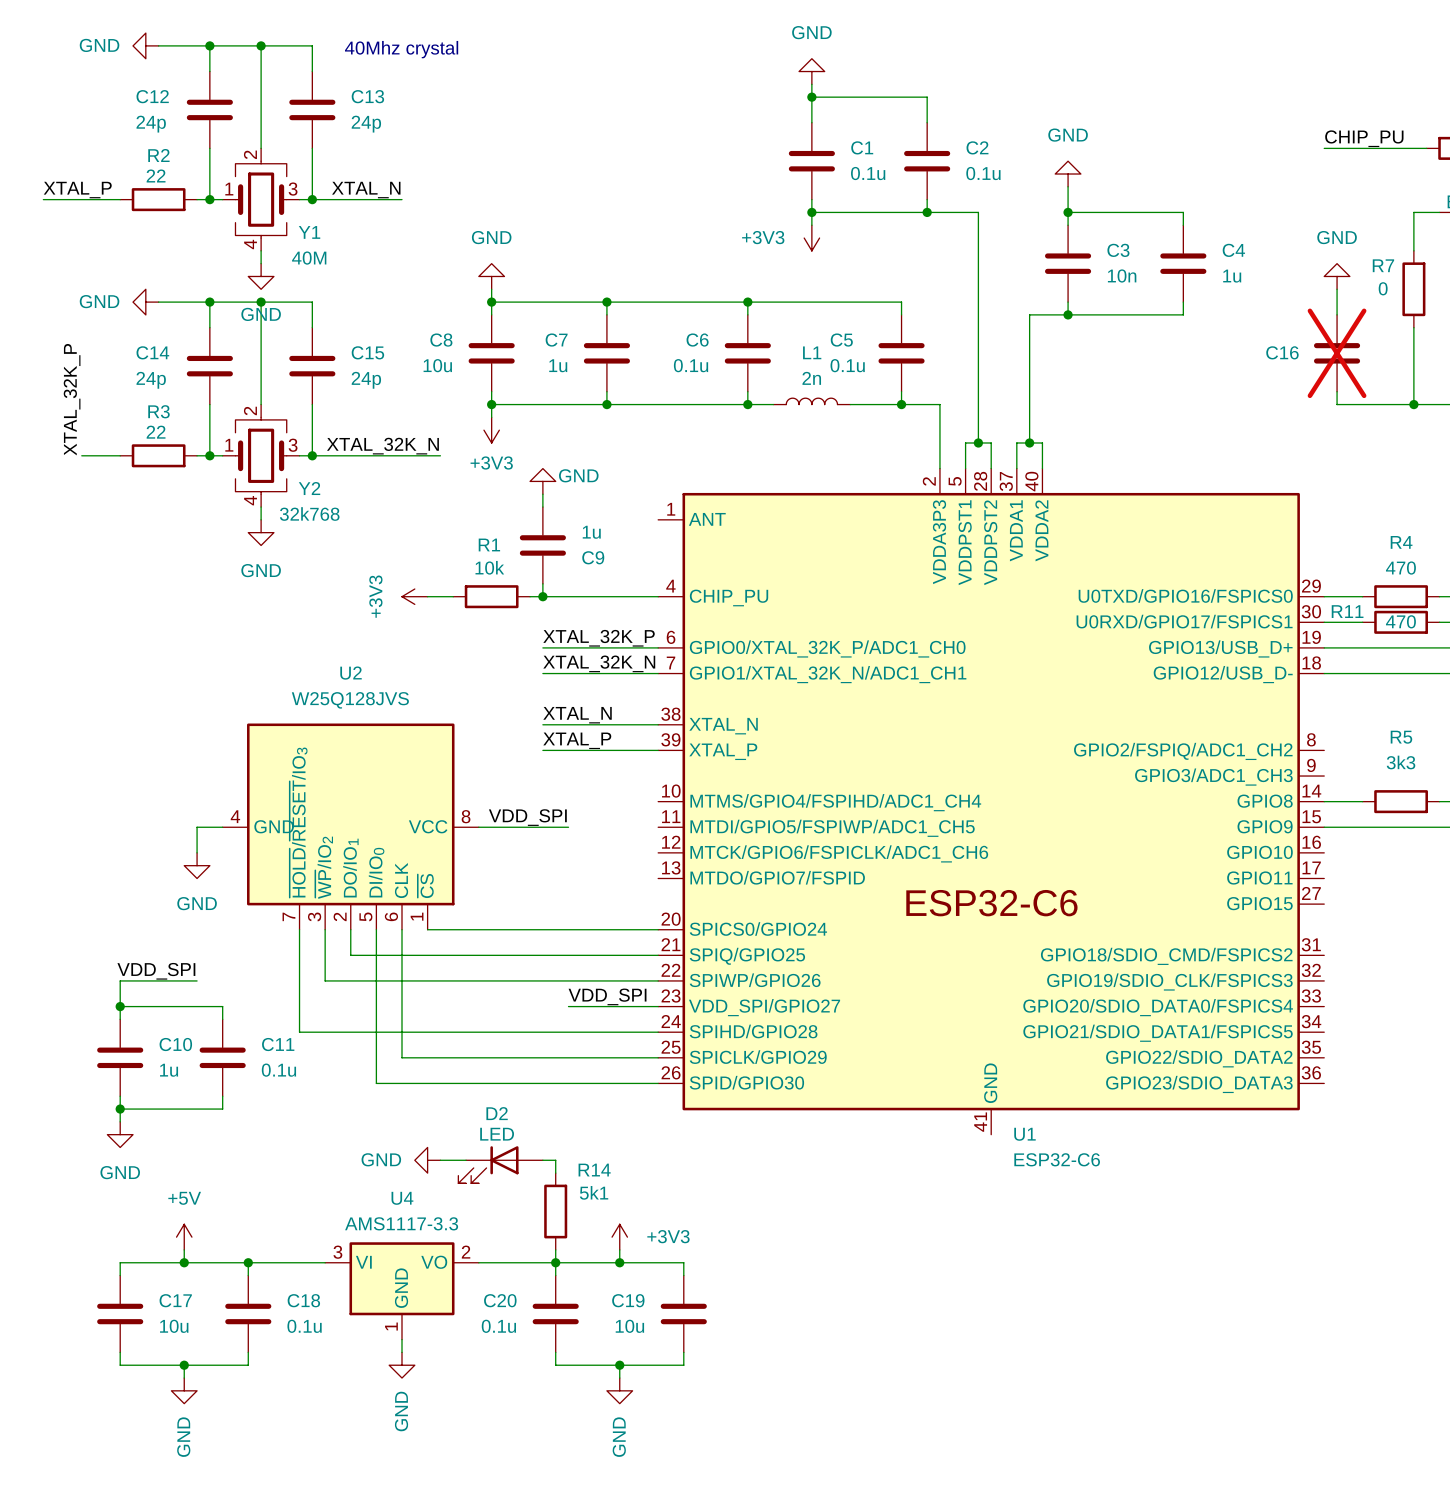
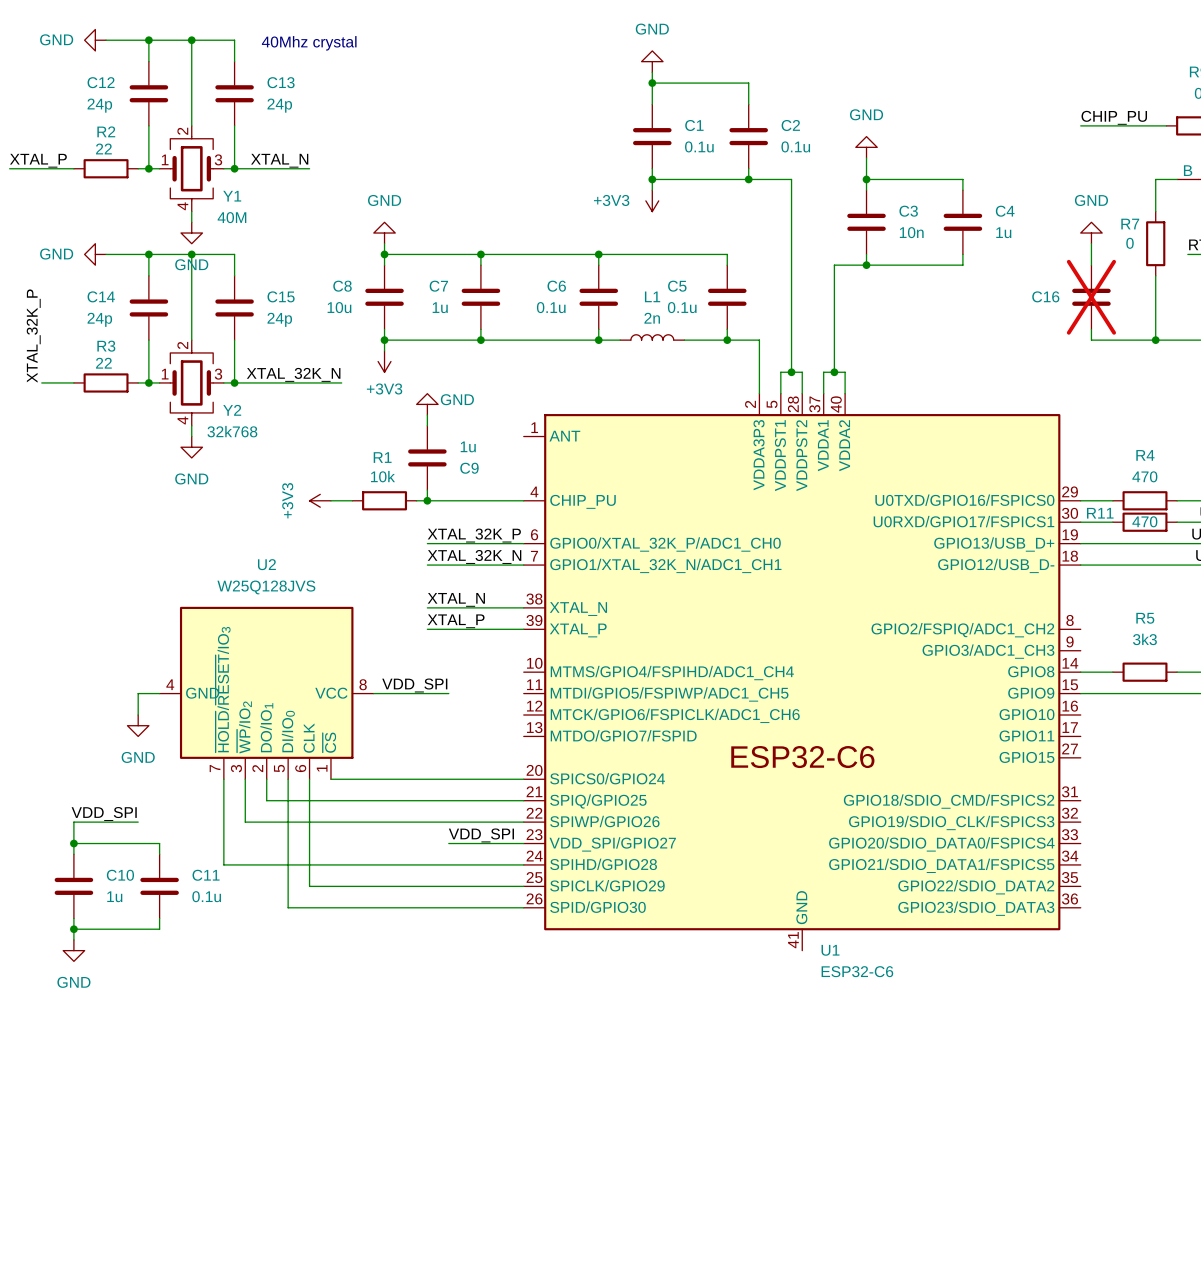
power symbol: GND (427, 1160) -> none
wire: (440, 1160) (466, 1160) -> none
wire: (542, 1160) (555, 1160) (555, 1173) -> none
D2: LED (500, 1164) -> none
R14: 5k1 (555, 1211) -> none
power symbol: +5V (184, 1237) -> none
power symbol: +3V3 (619, 1237) -> none
wire: (184, 1249) (184, 1262) -> none
wire: (555, 1249) (555, 1275) -> none
wire: (619, 1249) (619, 1262) -> none
junction: (184, 1262) -> none
wire: (248, 1262) (248, 1275) -> none
junction: (248, 1262) -> none
wire: (325, 1262) (120, 1262) (120, 1275) -> none
wire: (478, 1262) (683, 1262) (683, 1275) -> none
junction: (555, 1262) -> none
junction: (619, 1262) -> none
U4: AMS1117-3.3 (402, 1290) -> none
C17: 10u (120, 1313) -> none
C18: 0.1u (248, 1313) -> none
C20: 0.1u (555, 1313) -> none
C19: 10u (683, 1313) -> none
wire: (402, 1339) (402, 1352) -> none
wire: (120, 1352) (120, 1365) (248, 1365) (248, 1352) -> none
wire: (555, 1352) (555, 1365) (683, 1365) (683, 1352) -> none
wire: (184, 1365) (184, 1378) -> none
junction: (184, 1365) -> none
power symbol: GND (402, 1365) -> none
wire: (619, 1365) (619, 1378) -> none
junction: (619, 1365) -> none
power symbol: GND (184, 1390) -> none
power symbol: GND (619, 1390) -> none

